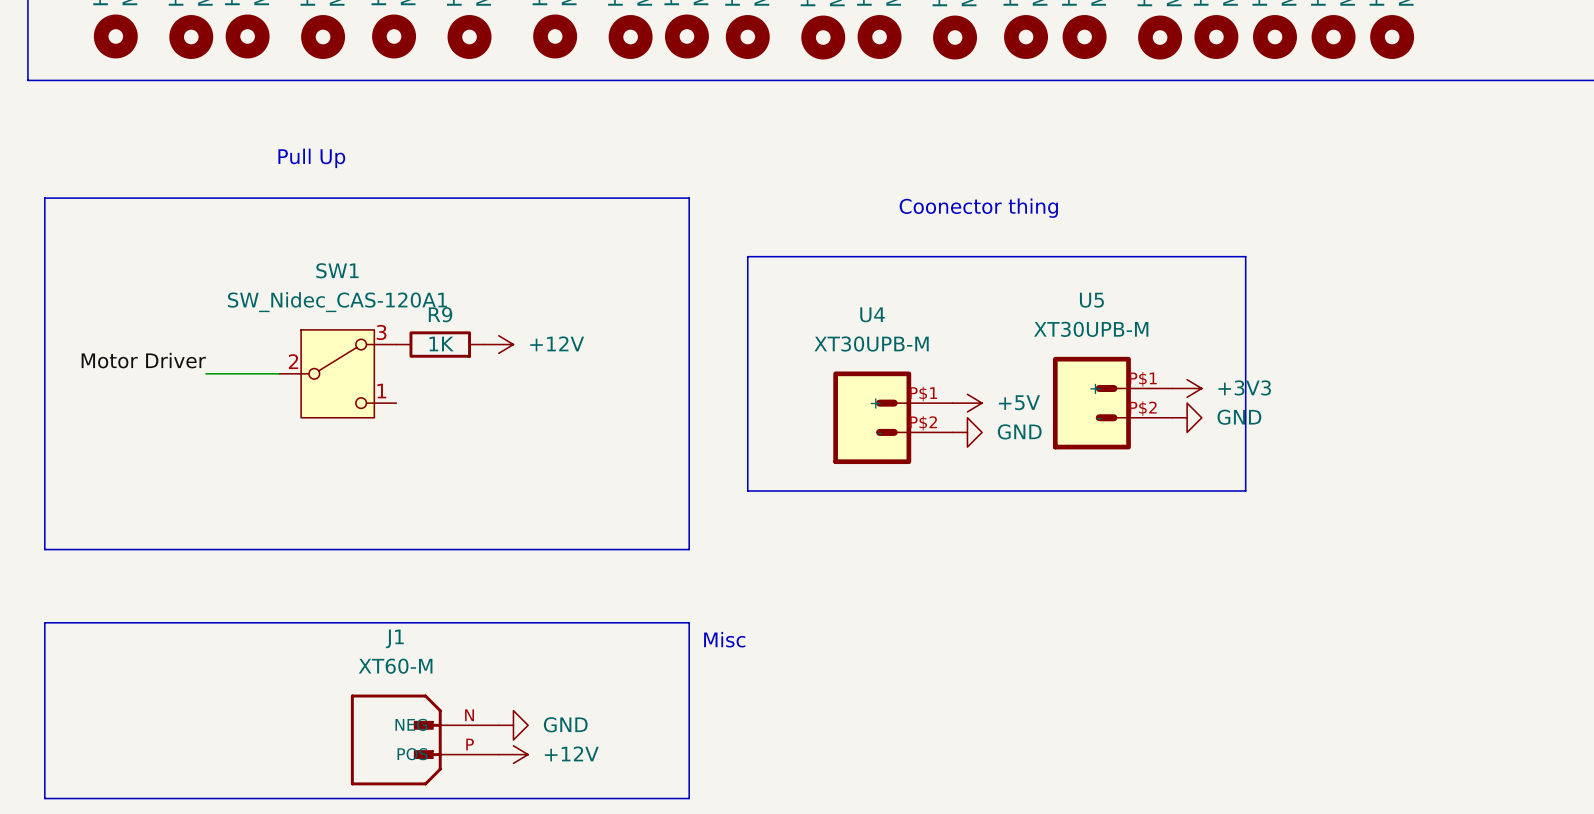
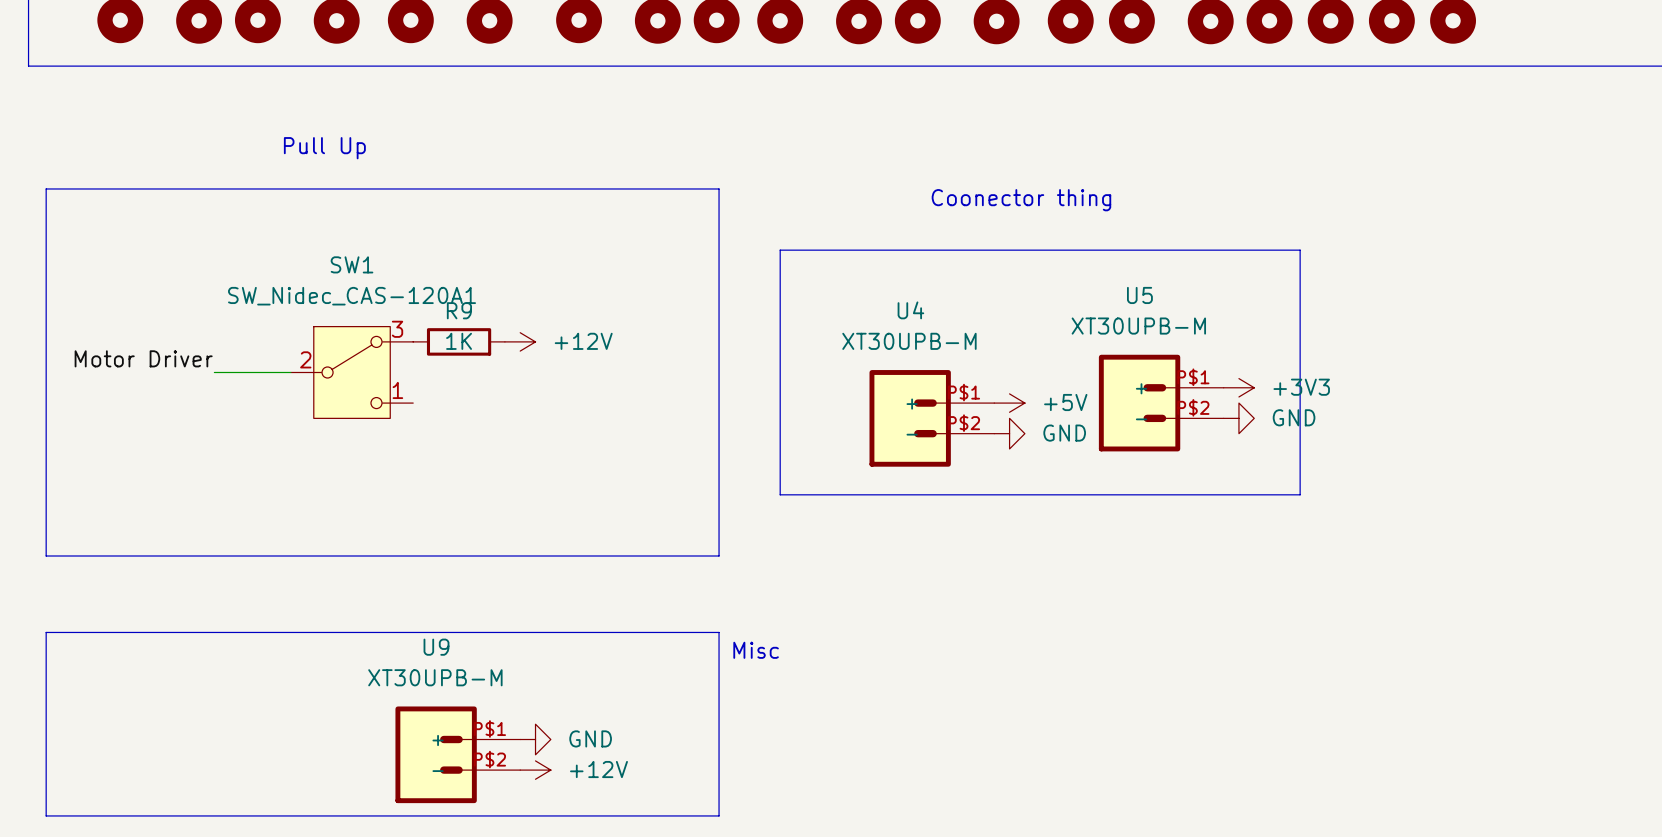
J1: XT60-M (424, 739) -> none
U9: none -> XT30UPB-M (457, 754)

